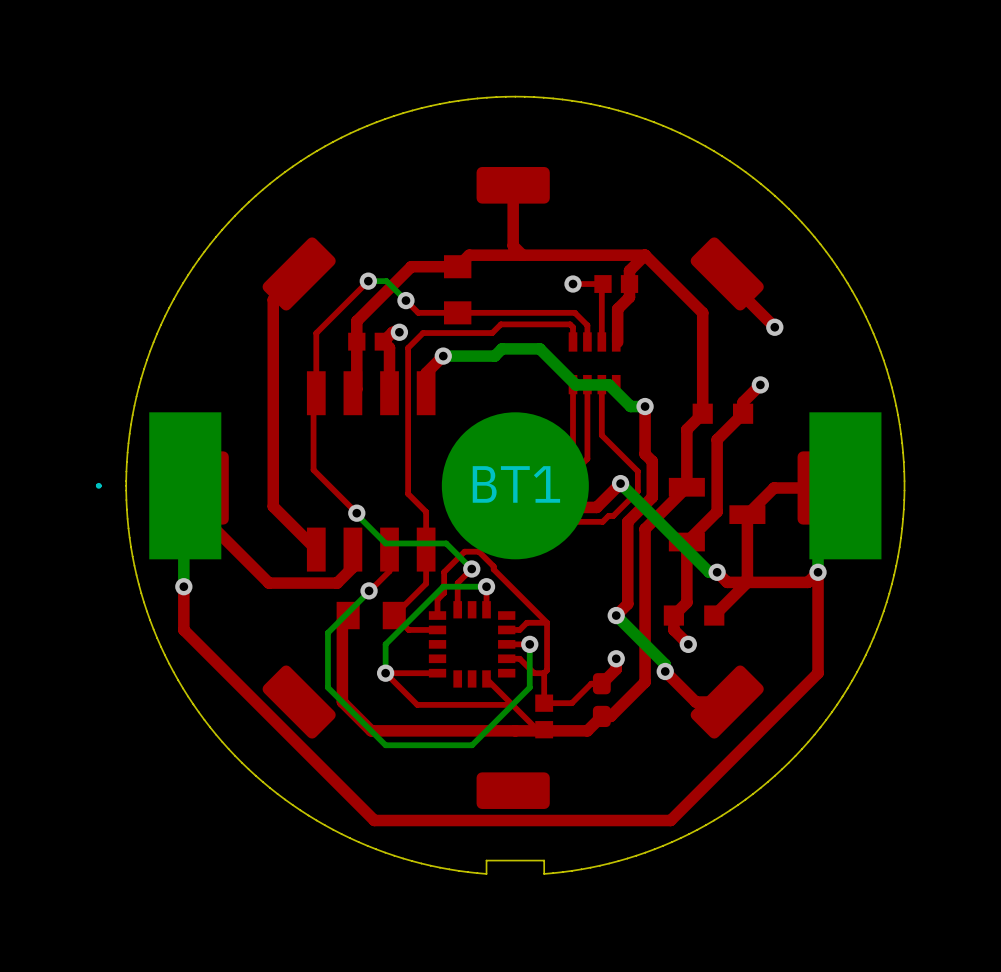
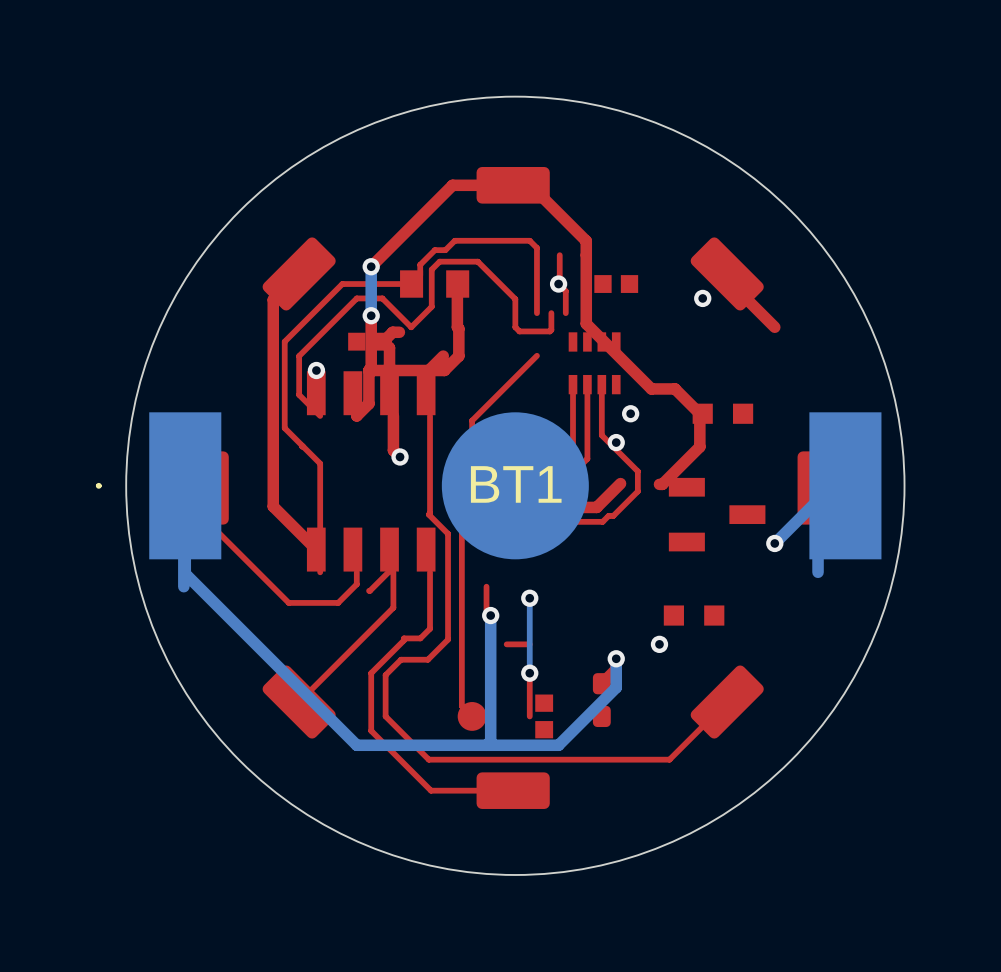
round board edge: none -> [125, 95, 906, 876]
board edge: (524, 96) (562, 99) (599, 105) (636, 115) (671, 129) (714, 151) (745, 172) (775, 195) (802, 222) (826, 251) (847, 283) (869, 324) (883, 360) (894, 396) (901, 433) (904, 471) (903, 509) (899, 547) (891, 584) (880, 620) (865, 655) (847, 688) (820, 727) (795, 755) (767, 781) (737, 805) (705, 825) (671, 842) (636, 855) (590, 867) (544, 873) (544, 860) (486, 860) (486, 873) (449, 869) (412, 861) (376, 849) (341, 834) (308, 815) (277, 793) (248, 769) (222, 741) (198, 712) (178, 680) (160, 646) (147, 611) (136, 575) (129, 537) (126, 500) (126, 462) (136, 396) (147, 360) (160, 324) (178, 291) (198, 259) (222, 229) (248, 202) (277, 177) (308, 156) (341, 137) (376, 122) (412, 110) (449, 102) (486, 97) (524, 96) -> none
top track: (513, 185) (513, 245) (522, 255) -> none
top track: none -> (559, 255) (558, 284) (565, 291) (565, 313)
top track: (645, 255) (469, 255) (457, 266) (411, 266) (356, 321) (356, 389) (352, 393) -> none
top track: (645, 255) (702, 312) (702, 413) (686, 429) (686, 487) (645, 529) (645, 682) (610, 716) (601, 716) (587, 730) (371, 730) (342, 702) (342, 621) (348, 615) -> none
top track: (645, 255) (629, 270) (629, 297) (617, 309) (617, 342) -> none
top track: none -> (371, 266) (452, 185) (530, 185) (586, 241) (586, 323) (651, 388) (675, 388) (699, 413) (699, 446) (662, 484) (659, 484)
bottom track: none -> (371, 266) (371, 315)
top track: (368, 281) (316, 333) (313, 469) (356, 513) -> none
bottom track: (368, 281) (386, 281) (405, 300) -> none
via position: (368, 281) -> (371, 266)
top track: none -> (457, 284) (458, 356) (444, 370) (368, 370)
top track: (573, 284) (602, 284) (601, 342) -> none
via position: (573, 284) -> (558, 284)
part rotation: 0° (457, 289) -> 90° clockwise (434, 284)
via: none -> (702, 298)
top track: (405, 300) (418, 312) (574, 312) (587, 325) (587, 342) -> none
via: (405, 300) -> none
top track: none -> (536, 313) (536, 247) (529, 240) (454, 240) (445, 250) (434, 250) (420, 264) (420, 275) (411, 284) (342, 284) (284, 341) (284, 428) (320, 463) (320, 572)
top track: none -> (551, 313) (549, 331) (519, 331) (515, 327) (515, 299) (477, 261) (439, 261) (431, 269) (431, 306) (411, 327) (382, 298) (356, 298) (299, 356) (299, 394) (320, 415)
top track: none -> (371, 315) (371, 368) (368, 370)
via: none -> (371, 315)
via: (774, 327) -> none
via: (399, 332) -> none
top track: (573, 342) (573, 327) (570, 324) (500, 324) (492, 333) (423, 333) (408, 348) (408, 493) (426, 511) (426, 583) (394, 615) (408, 629) (437, 629) -> none
top track: none -> (536, 355) (472, 420) (472, 471) (461, 481) (461, 706) (472, 716)
bottom track: (443, 356) (494, 356) (502, 348) (539, 348) (575, 384) (609, 384) (630, 406) (645, 406) -> none
via: (443, 356) -> none
via: none -> (316, 370)
top track: none -> (368, 370) (368, 403) (356, 415) (356, 403)
top track: (760, 384) (743, 402) (743, 413) (717, 439) (717, 511) (686, 542) (686, 602) (673, 615) (673, 629) (688, 644) -> none
via: (760, 384) -> none
top track: (645, 406) (645, 454) (652, 461) (652, 497) (627, 521) (627, 604) (616, 615) -> none
via position: (645, 406) -> (630, 413)
top track: none -> (393, 415) (393, 450) (400, 456)
via: none -> (616, 442)
via: none -> (400, 456)
bottom track: (620, 483) (709, 572) (717, 572) -> none
via: (620, 483) -> none
bottom track: none -> (845, 485) (832, 485) (774, 543)
top track width: thick (210, 487) (210, 524) (268, 583) -> thin (210, 487) (210, 524) (268, 583)
top track: (815, 487) (774, 487) (747, 514) (747, 582) (714, 615) -> none
bottom track: (356, 513) (385, 543) (446, 543) (471, 568) -> none
via: (356, 513) -> none
via: none -> (774, 543)
top track: (352, 549) (352, 567) (337, 583) (268, 583) -> (356, 572) (356, 584) (338, 602) (288, 602) (268, 583)
top track: (471, 568) (457, 583) (457, 609) -> none
via: (471, 568) -> none
top track: none -> (393, 572) (393, 607) (299, 702)
top track: none -> (430, 572) (430, 628) (420, 638) (403, 638) (371, 673) (371, 730) (431, 790) (513, 790)
top track: (717, 572) (727, 582) (807, 582) (818, 572) (818, 673) (670, 820) (374, 820) (183, 629) (183, 586) -> none
via: (717, 572) -> none
via: (818, 572) -> none
via: (183, 586) -> none
bottom track: (486, 586) (443, 586) (385, 644) (385, 673) -> none
via: (486, 586) -> none
bottom track: (369, 590) (327, 632) (327, 687) (385, 745) -> (185, 485) (185, 573) (356, 745) (385, 745)
via: (369, 590) -> none
bottom track: none -> (529, 598) (529, 644)
via: none -> (529, 598)
part: (371, 615) -> none
top track: (437, 615) (437, 599) (444, 593) (444, 572) (464, 551) (478, 551) (493, 566) (493, 569) (547, 622) -> none
bottom track: none -> (490, 615) (490, 741) (486, 745)
via: none -> (490, 615)
bottom track: (616, 615) (665, 664) (665, 671) -> none
via: (616, 615) -> none
top track: (547, 622) (547, 670) (544, 673) -> none
top track: (547, 622) (526, 622) (519, 629) (506, 629) -> none
part: (472, 644) -> none
via: (529, 644) -> none
via: none -> (659, 644)
via: (688, 644) -> none
top track: (506, 658) (519, 658) (534, 673) (544, 673) -> none
top track: (665, 671) (695, 702) (727, 702) -> (430, 415) (428, 514) (448, 533) (448, 639) (427, 659) (400, 659) (385, 675) (385, 716) (428, 759) (669, 759) (727, 702)
via: (665, 671) -> none
via: (385, 673) -> none
top track: (437, 673) (385, 673) (417, 704) (512, 704) -> none
top track: none -> (529, 673) (529, 716)
bottom track: (529, 673) (529, 687) (472, 745) -> (616, 658) (616, 687) (558, 745) (472, 745)
via: none -> (529, 673)
top track: (544, 673) (544, 703) (571, 703) (591, 683) (601, 683) (601, 687) -> none
top track: (486, 678) (537, 729) (544, 729) -> none
part: none -> (472, 716)
bottom track width: thin (472, 745) (385, 745) -> thick (472, 745) (385, 745)

